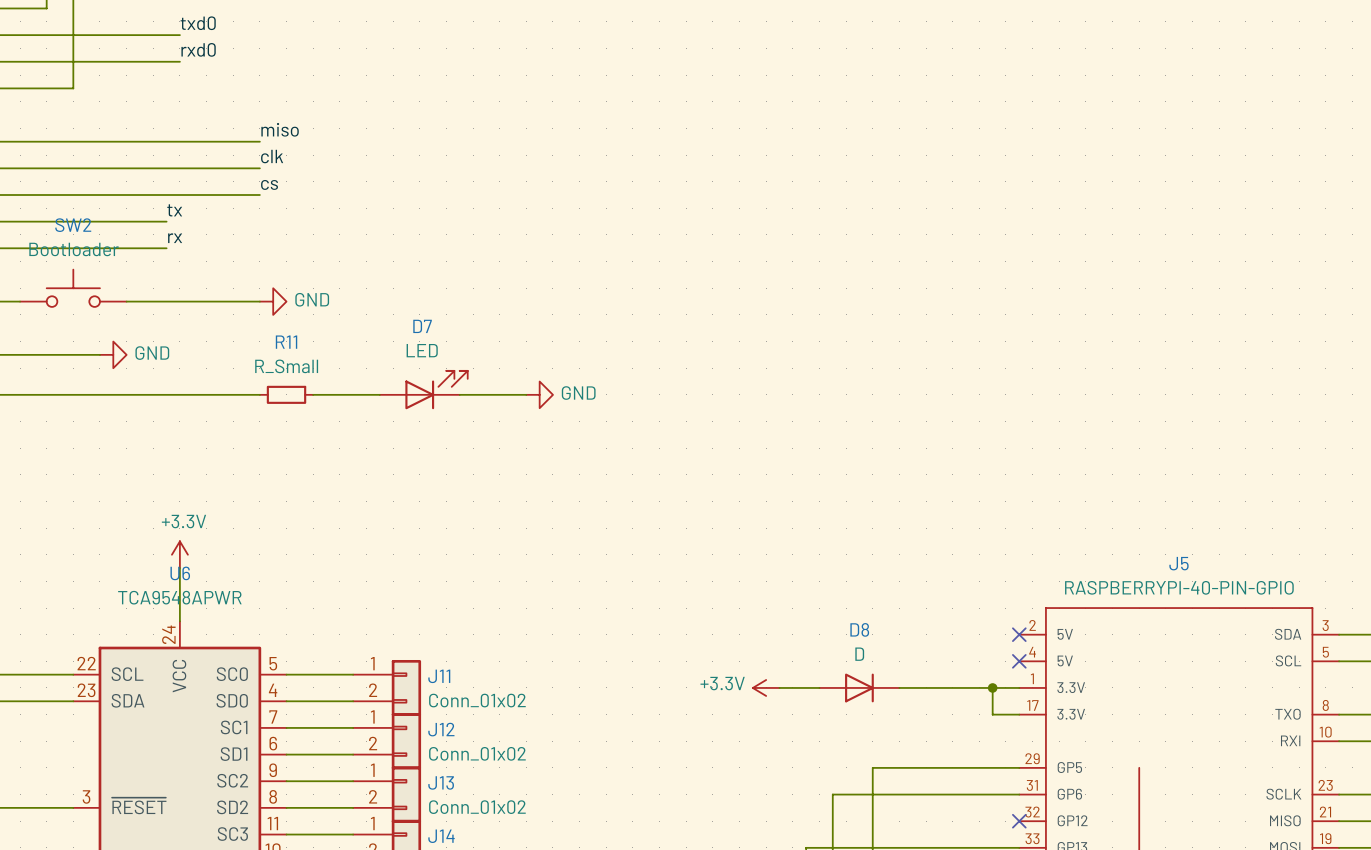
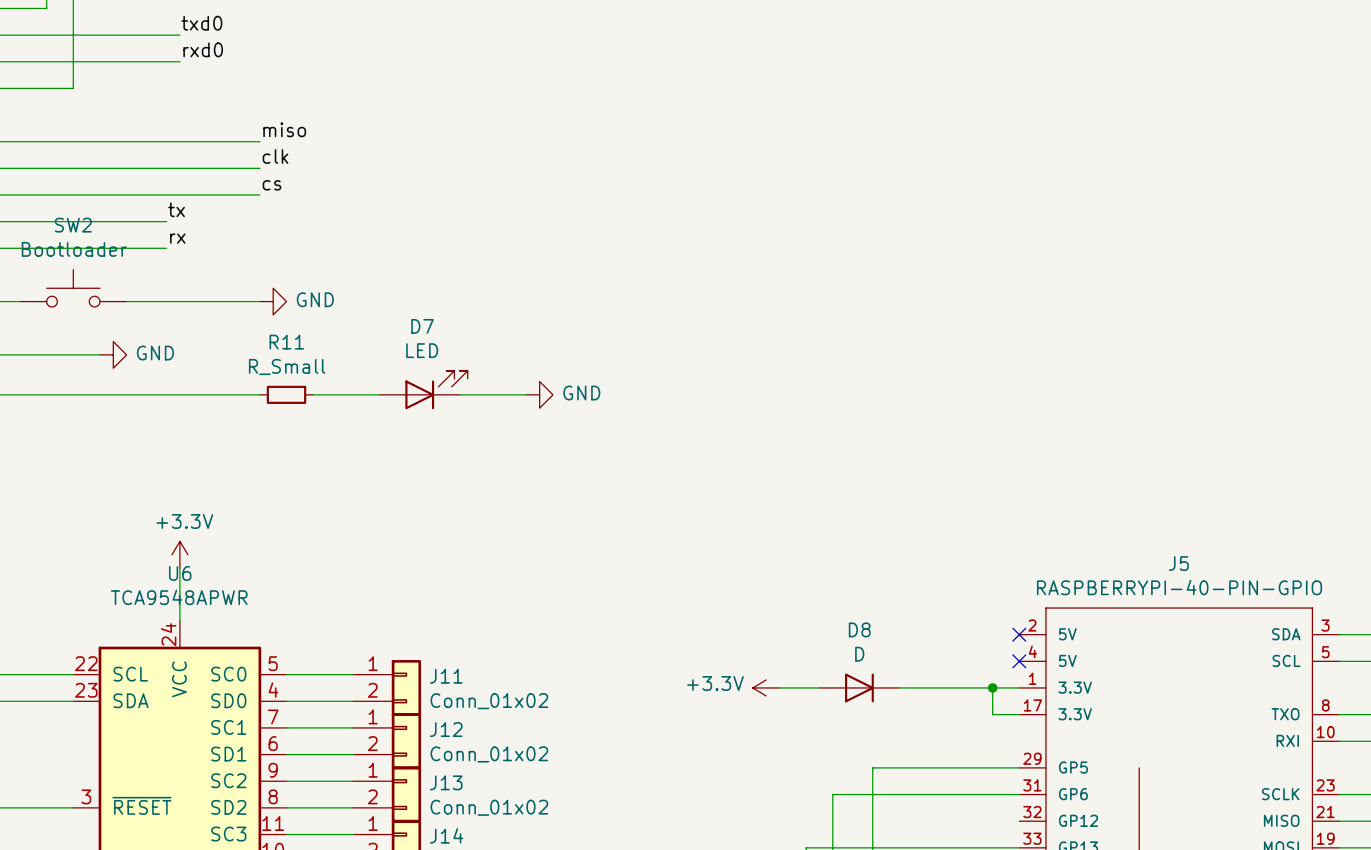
no-connect mark: (1019, 821) -> none

